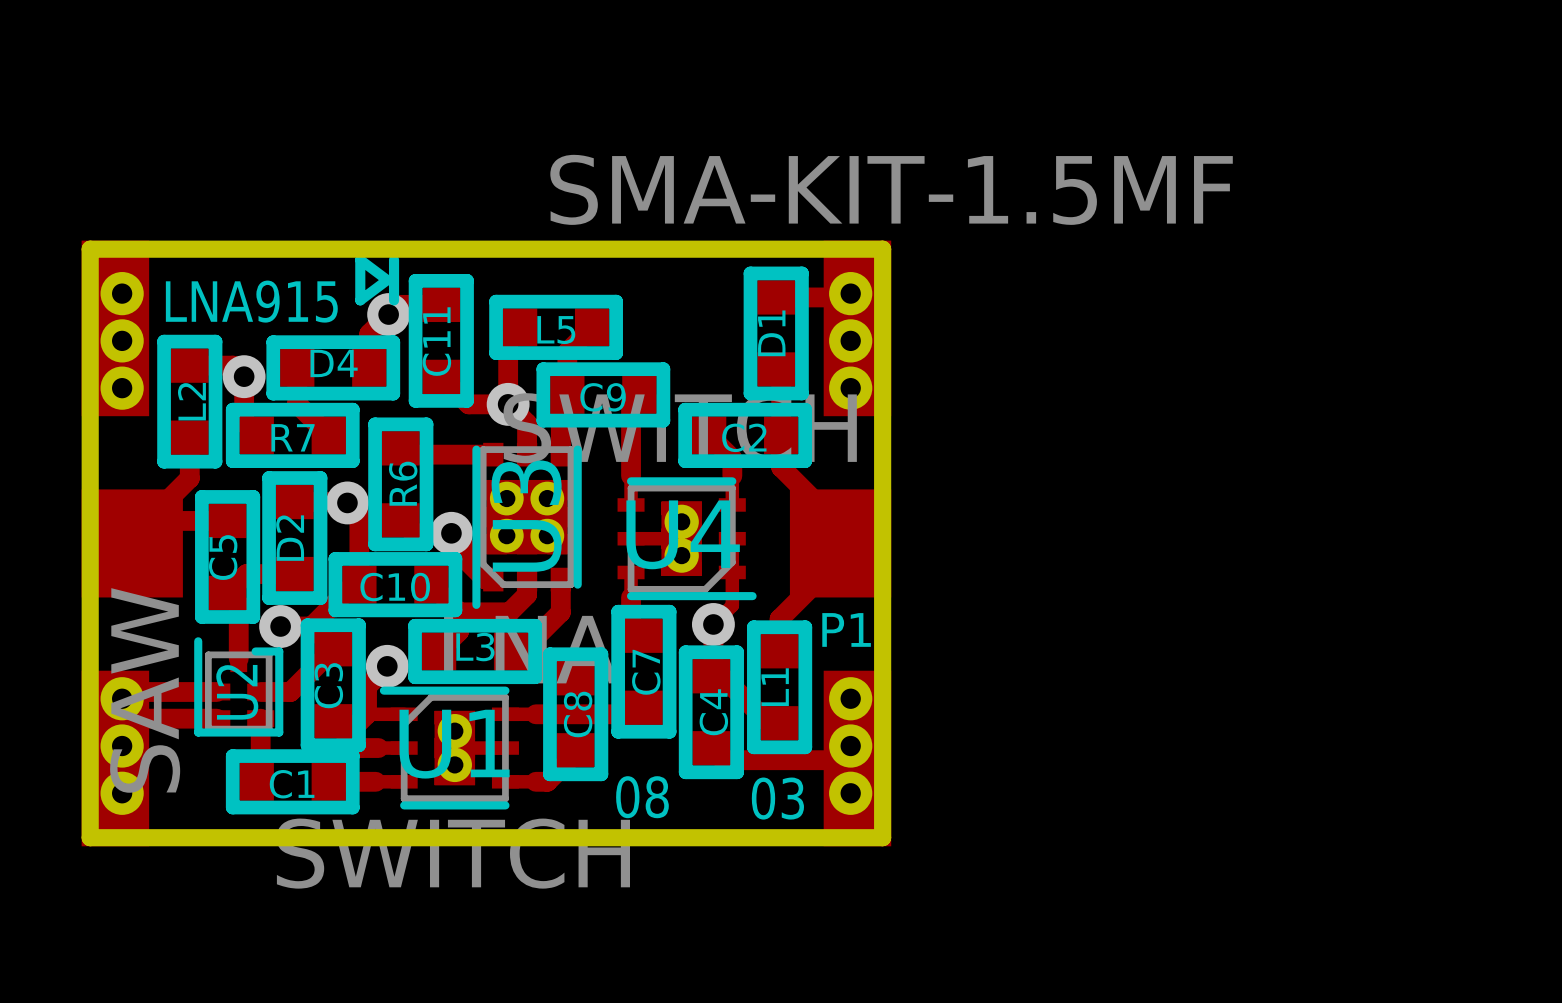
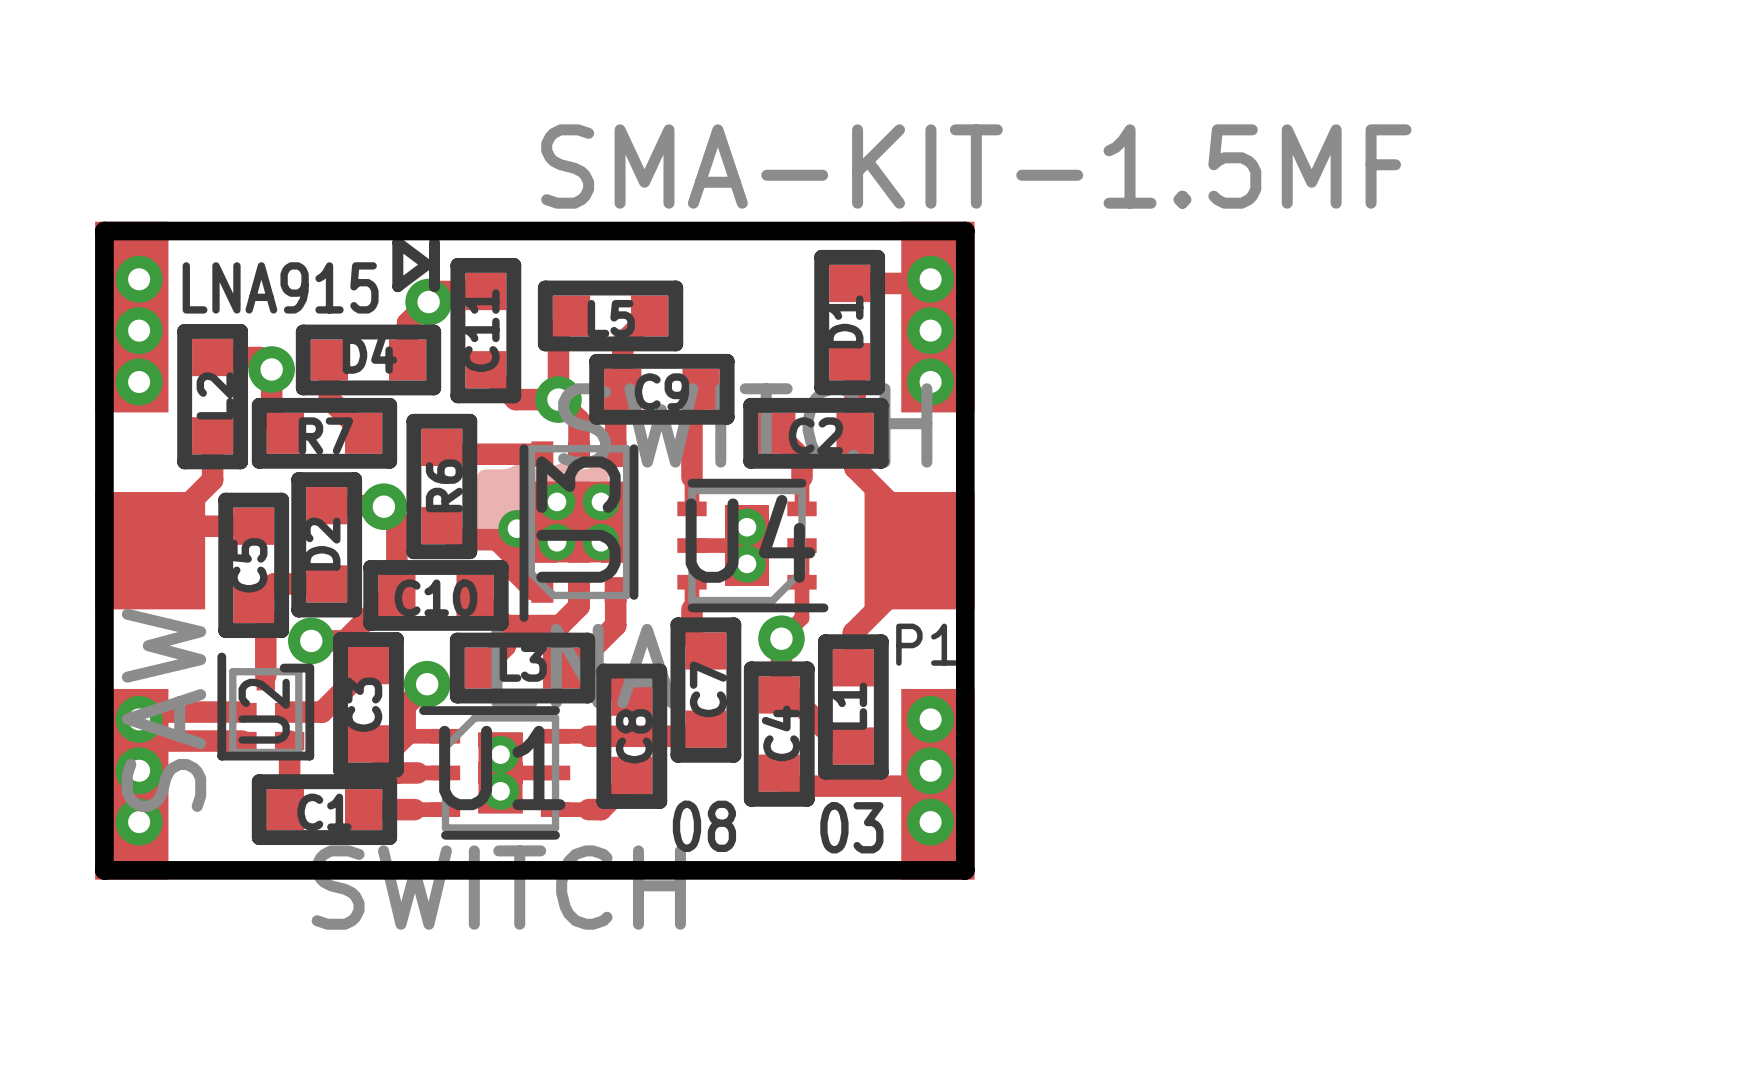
via position: (451, 533) -> (517, 528)

